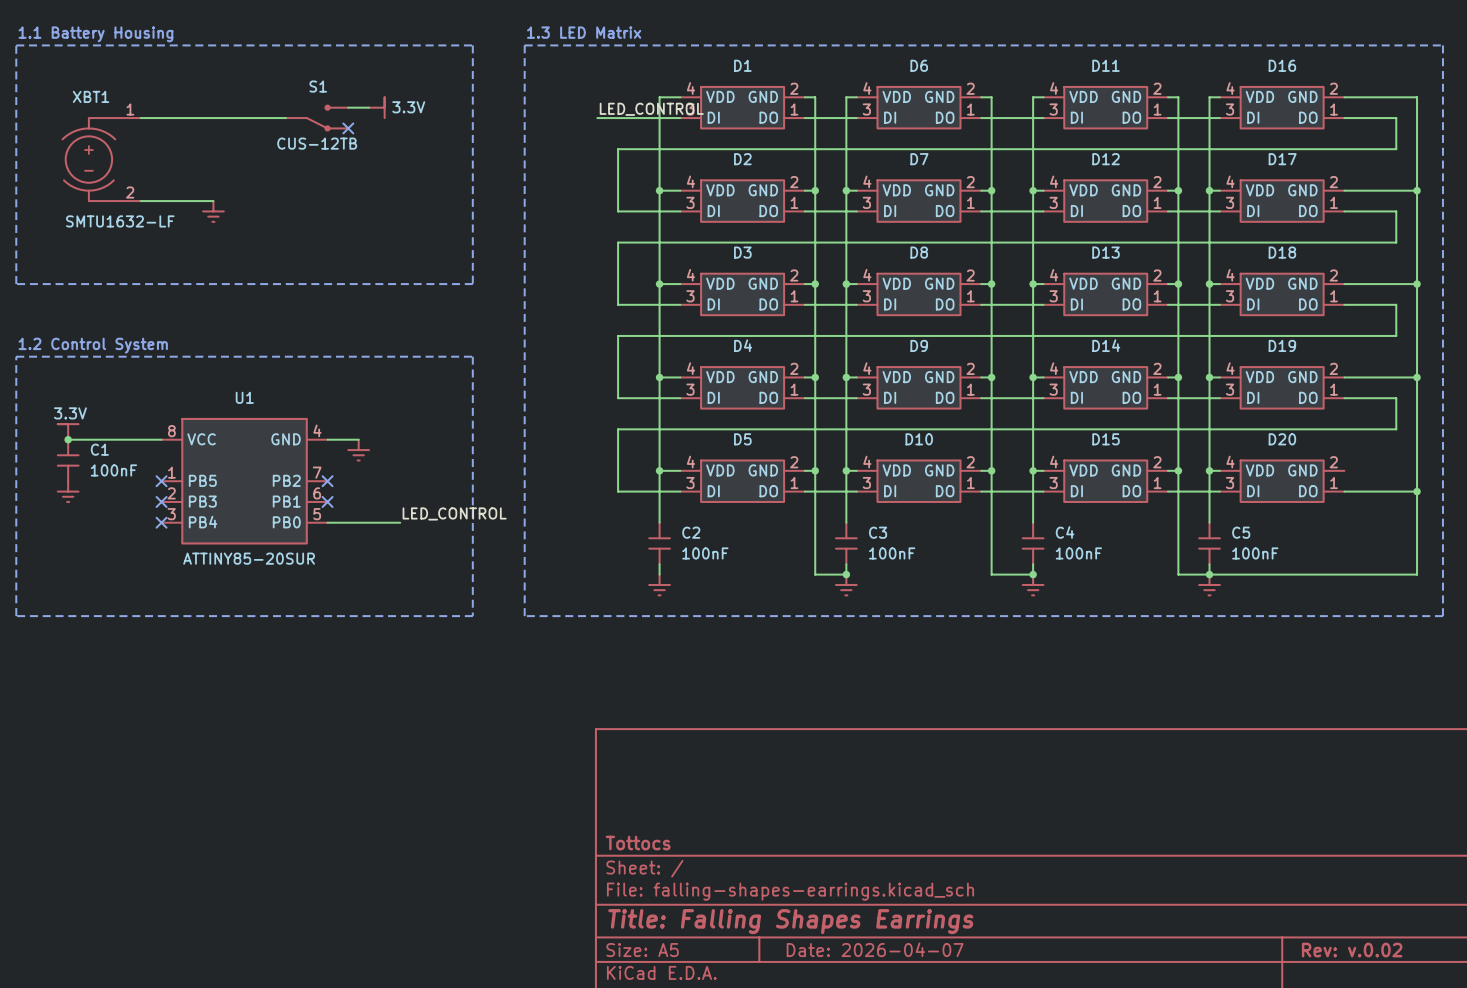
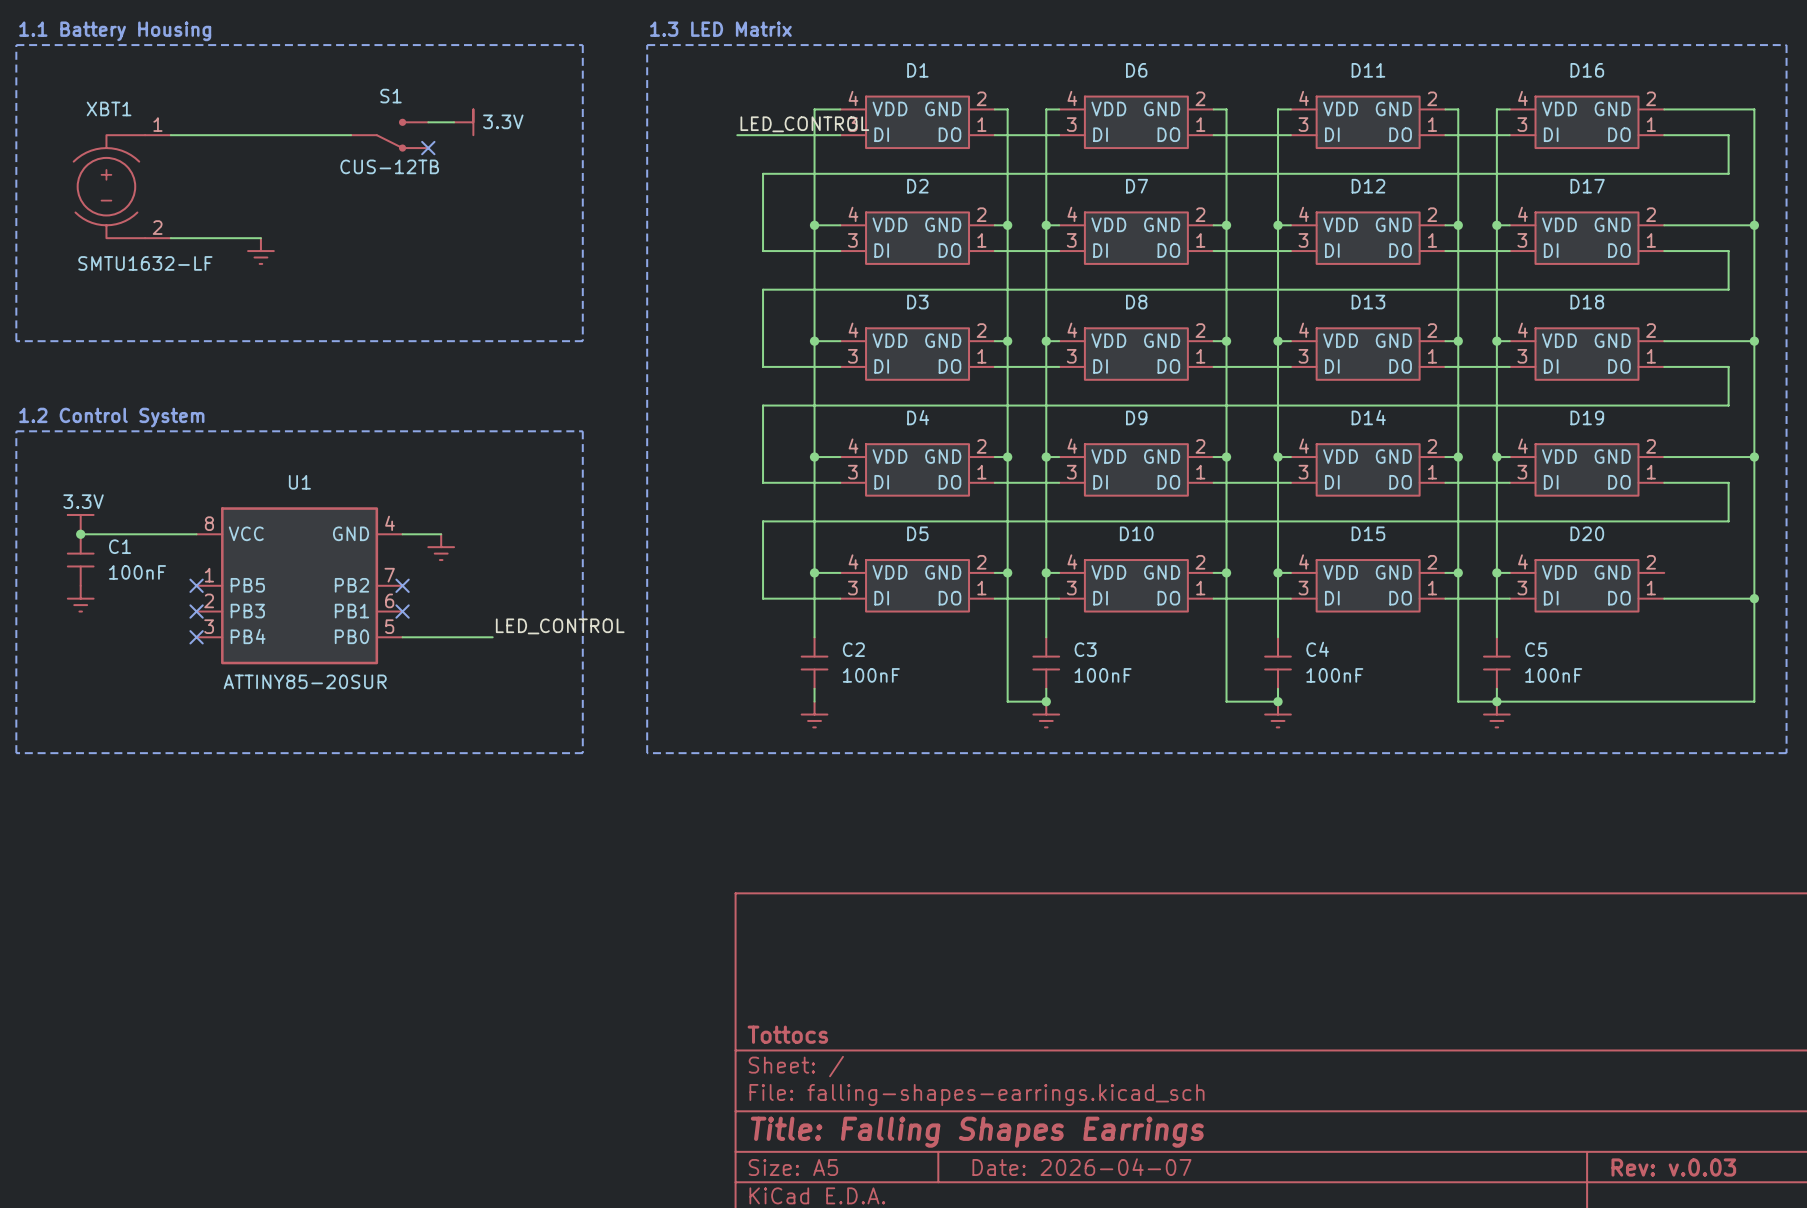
title block: Rev: v.0.02 (1352, 950) -> Rev: v.0.03 (1673, 1167)

